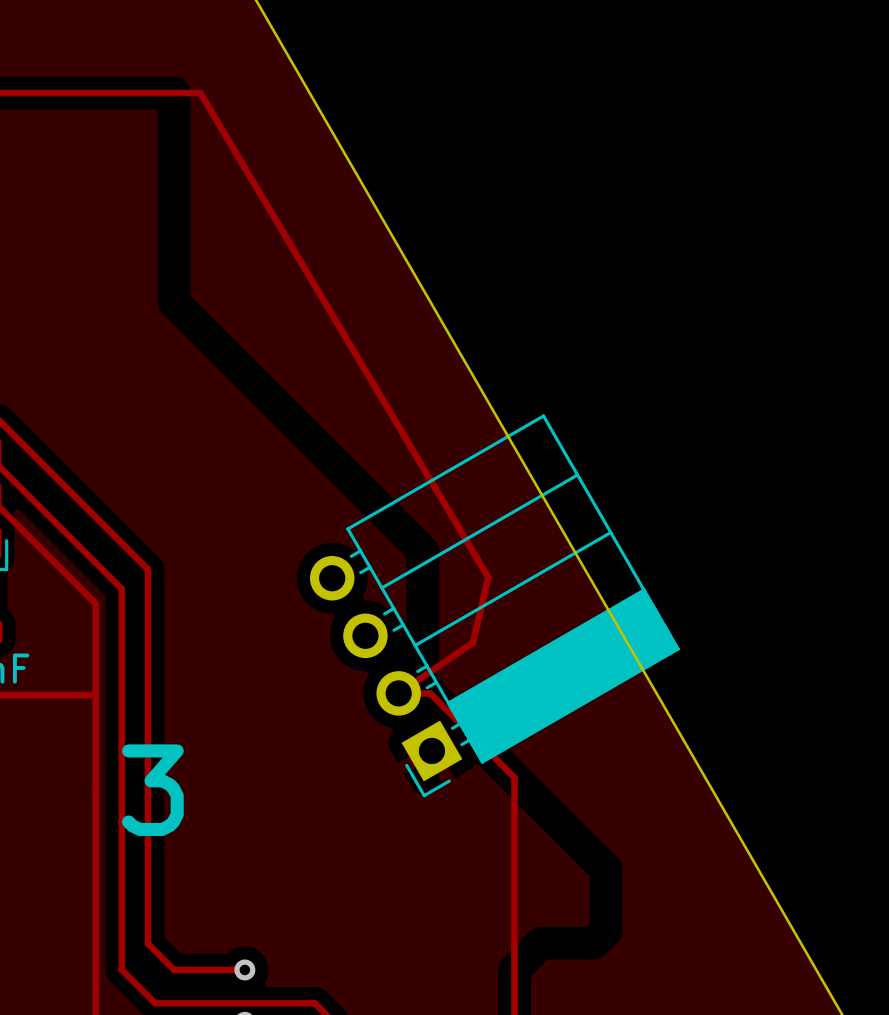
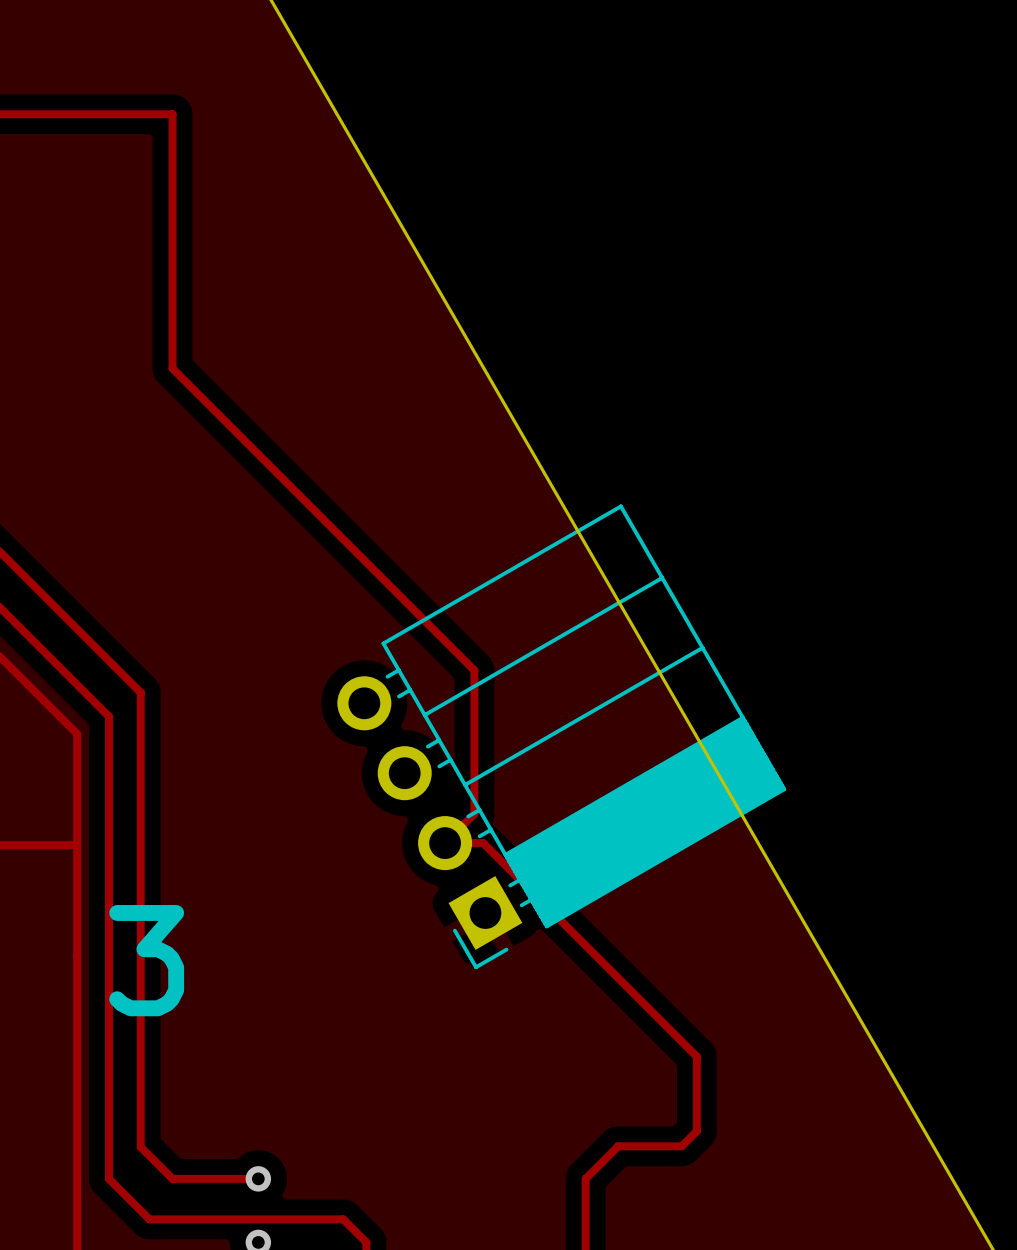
track: (174, 93) (200, 93) (488, 577) (473, 642) (398, 693) -> (172, 114) (172, 368) (474, 670) (474, 813) (445, 843)
track: (514, 777) (514, 969) -> (585, 945) (696, 1056) (696, 1131) (681, 1146) (618, 1146) (585, 1178)

